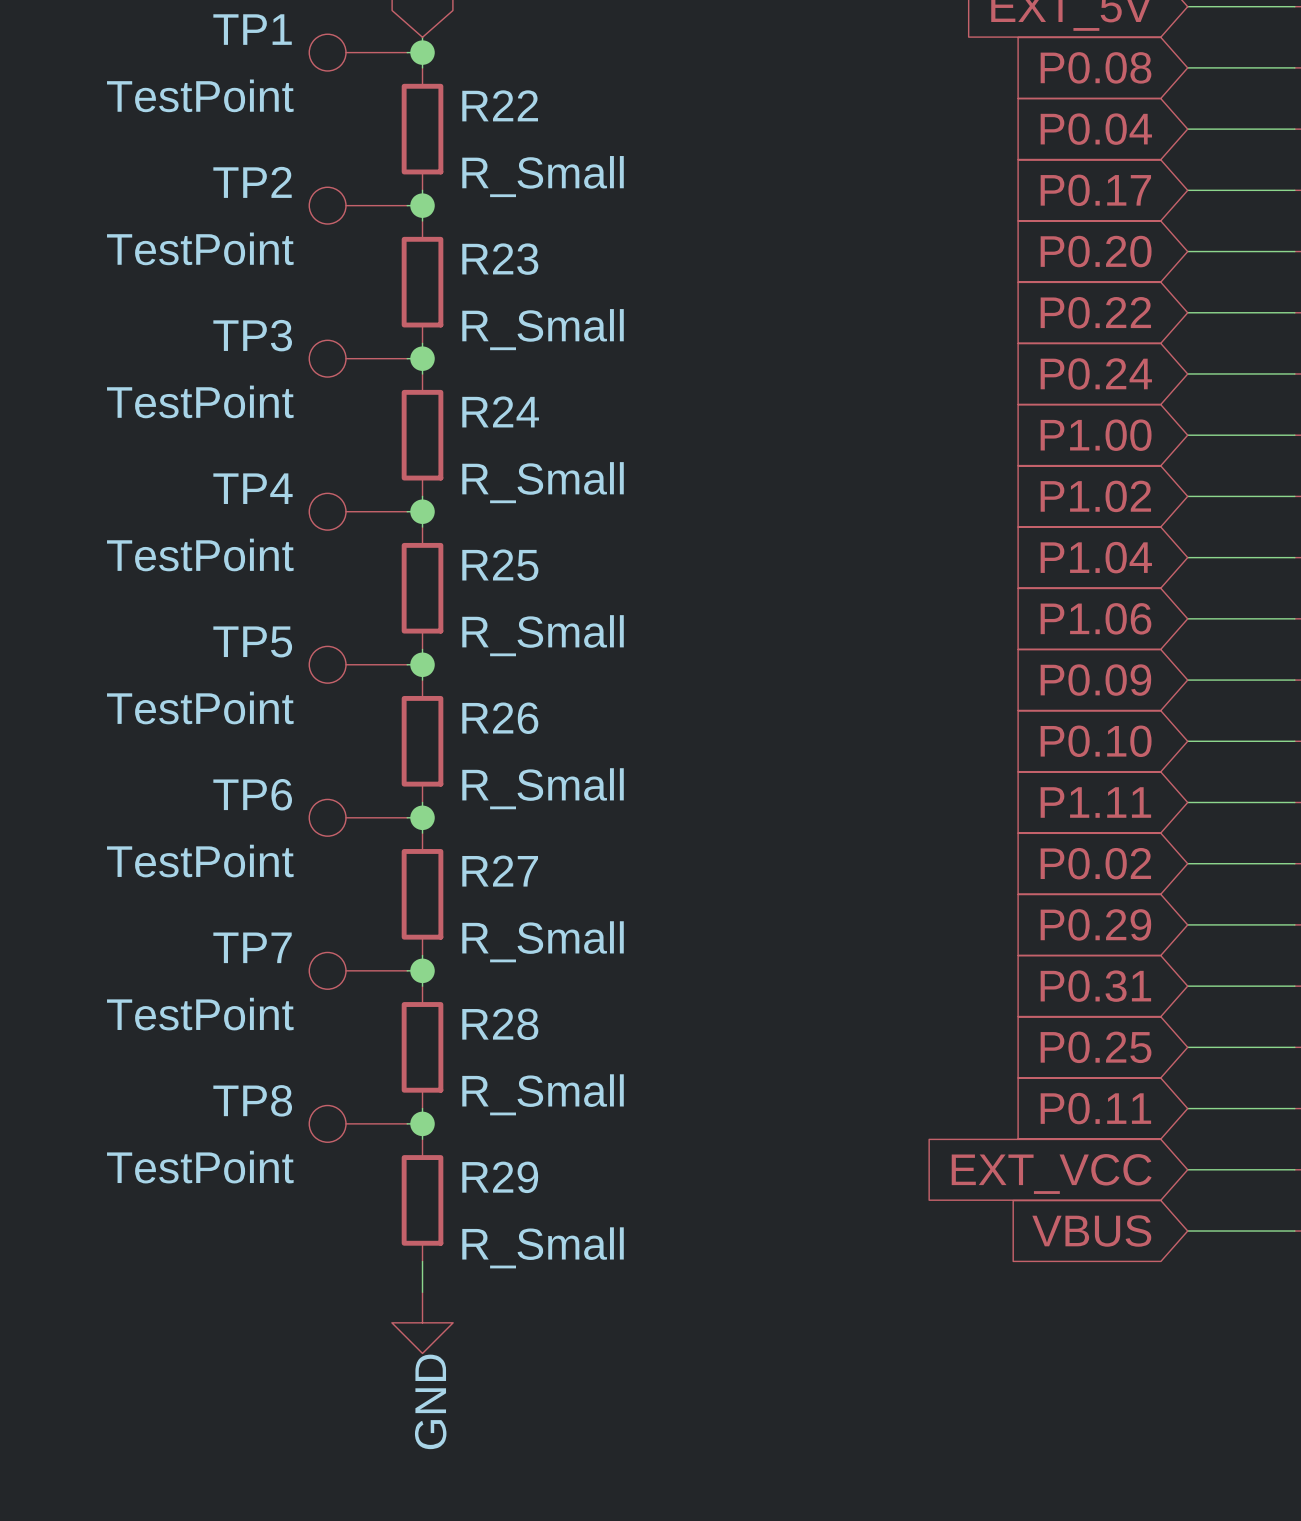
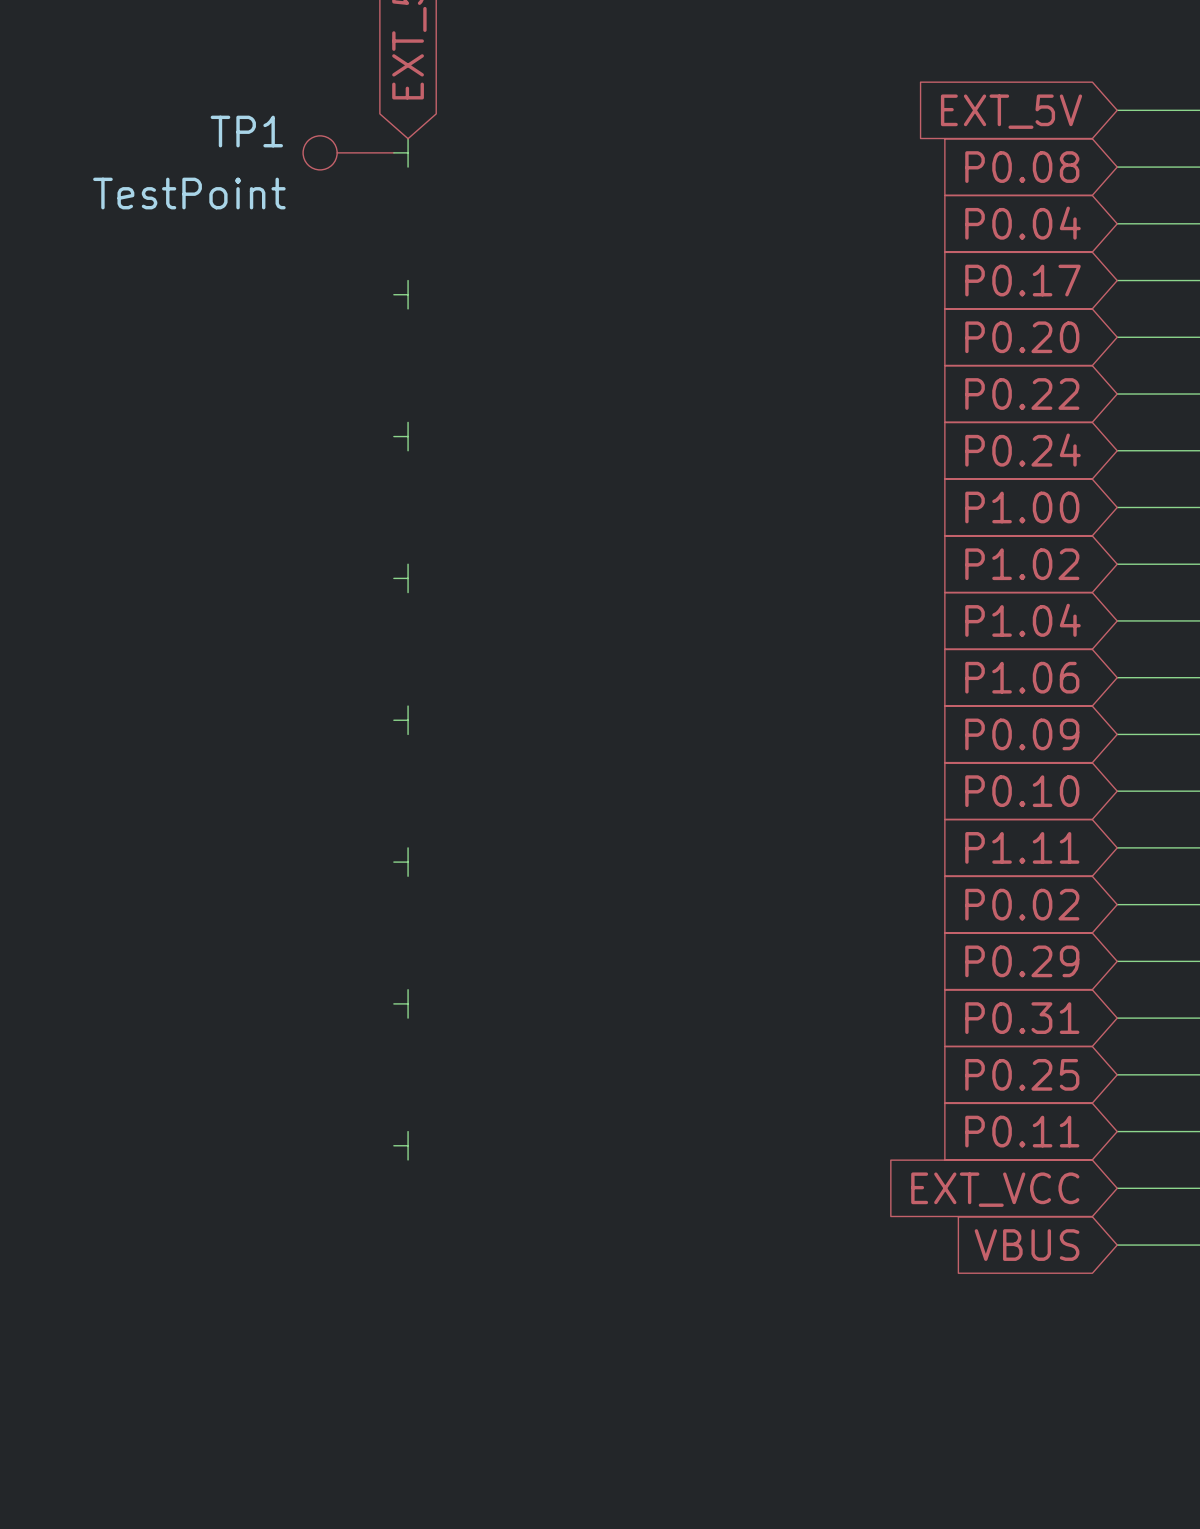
junction: (422, 52) -> none
R22: R_Small (422, 129) -> none
TP2: TestPoint (358, 205) -> none
junction: (422, 205) -> none
R23: R_Small (422, 282) -> none
TP3: TestPoint (358, 358) -> none
junction: (422, 358) -> none
R24: R_Small (422, 435) -> none
TP4: TestPoint (358, 511) -> none
junction: (422, 511) -> none
R25: R_Small (422, 588) -> none
TP5: TestPoint (358, 664) -> none
junction: (422, 664) -> none
R26: R_Small (422, 741) -> none
TP6: TestPoint (358, 817) -> none
junction: (422, 817) -> none
R27: R_Small (422, 894) -> none
TP7: TestPoint (358, 970) -> none
junction: (422, 970) -> none
R28: R_Small (422, 1047) -> none
TP8: TestPoint (358, 1123) -> none
junction: (422, 1123) -> none
R29: R_Small (422, 1200) -> none
wire: (422, 1261) (422, 1292) -> none
power symbol: GND (422, 1322) -> none

